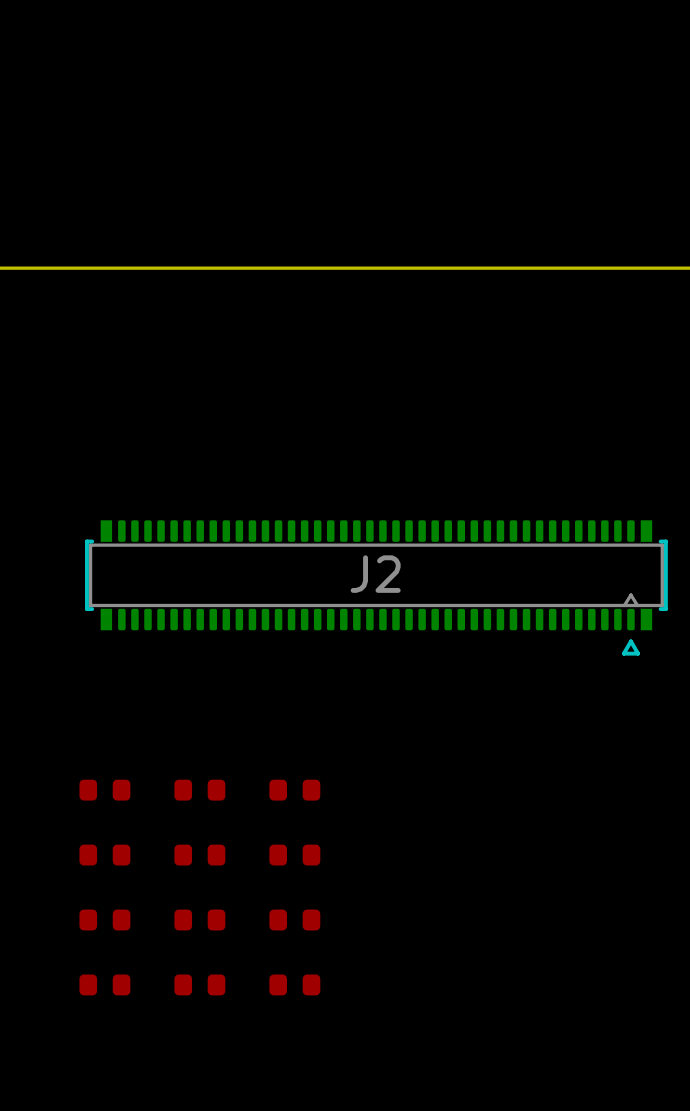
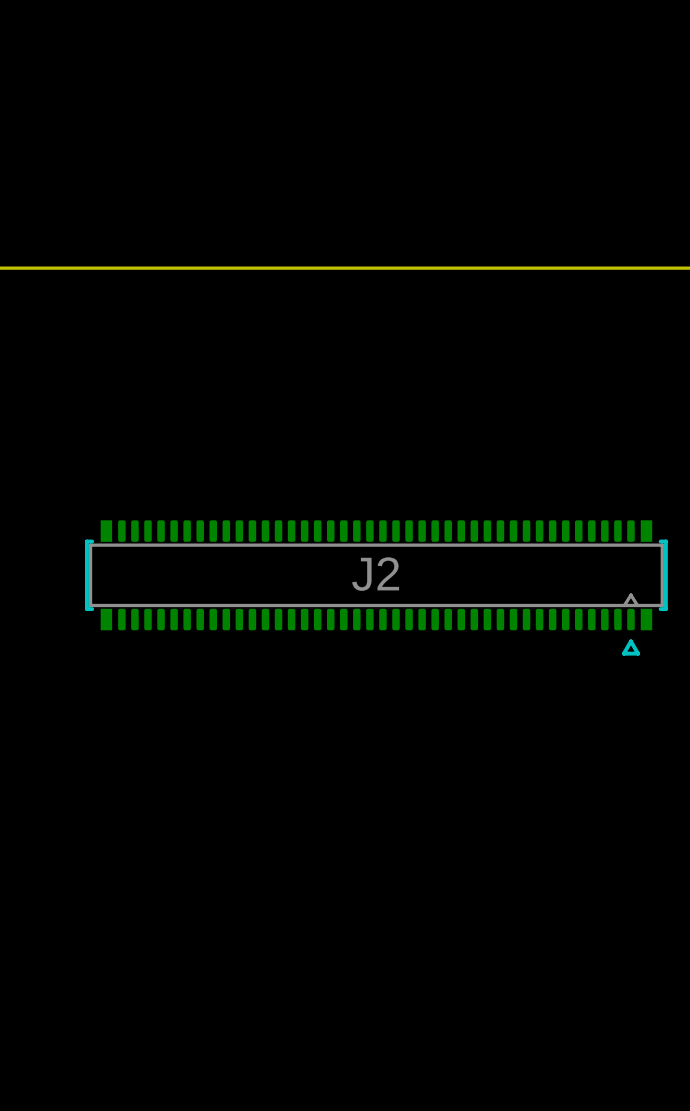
part: (104, 790) -> none
part: (199, 790) -> none
part: (294, 790) -> none
part: (104, 855) -> none
part: (199, 855) -> none
part: (294, 855) -> none
part: (104, 920) -> none
part: (199, 920) -> none
part: (294, 920) -> none
part: (104, 984) -> none
part: (199, 984) -> none
part: (294, 984) -> none

